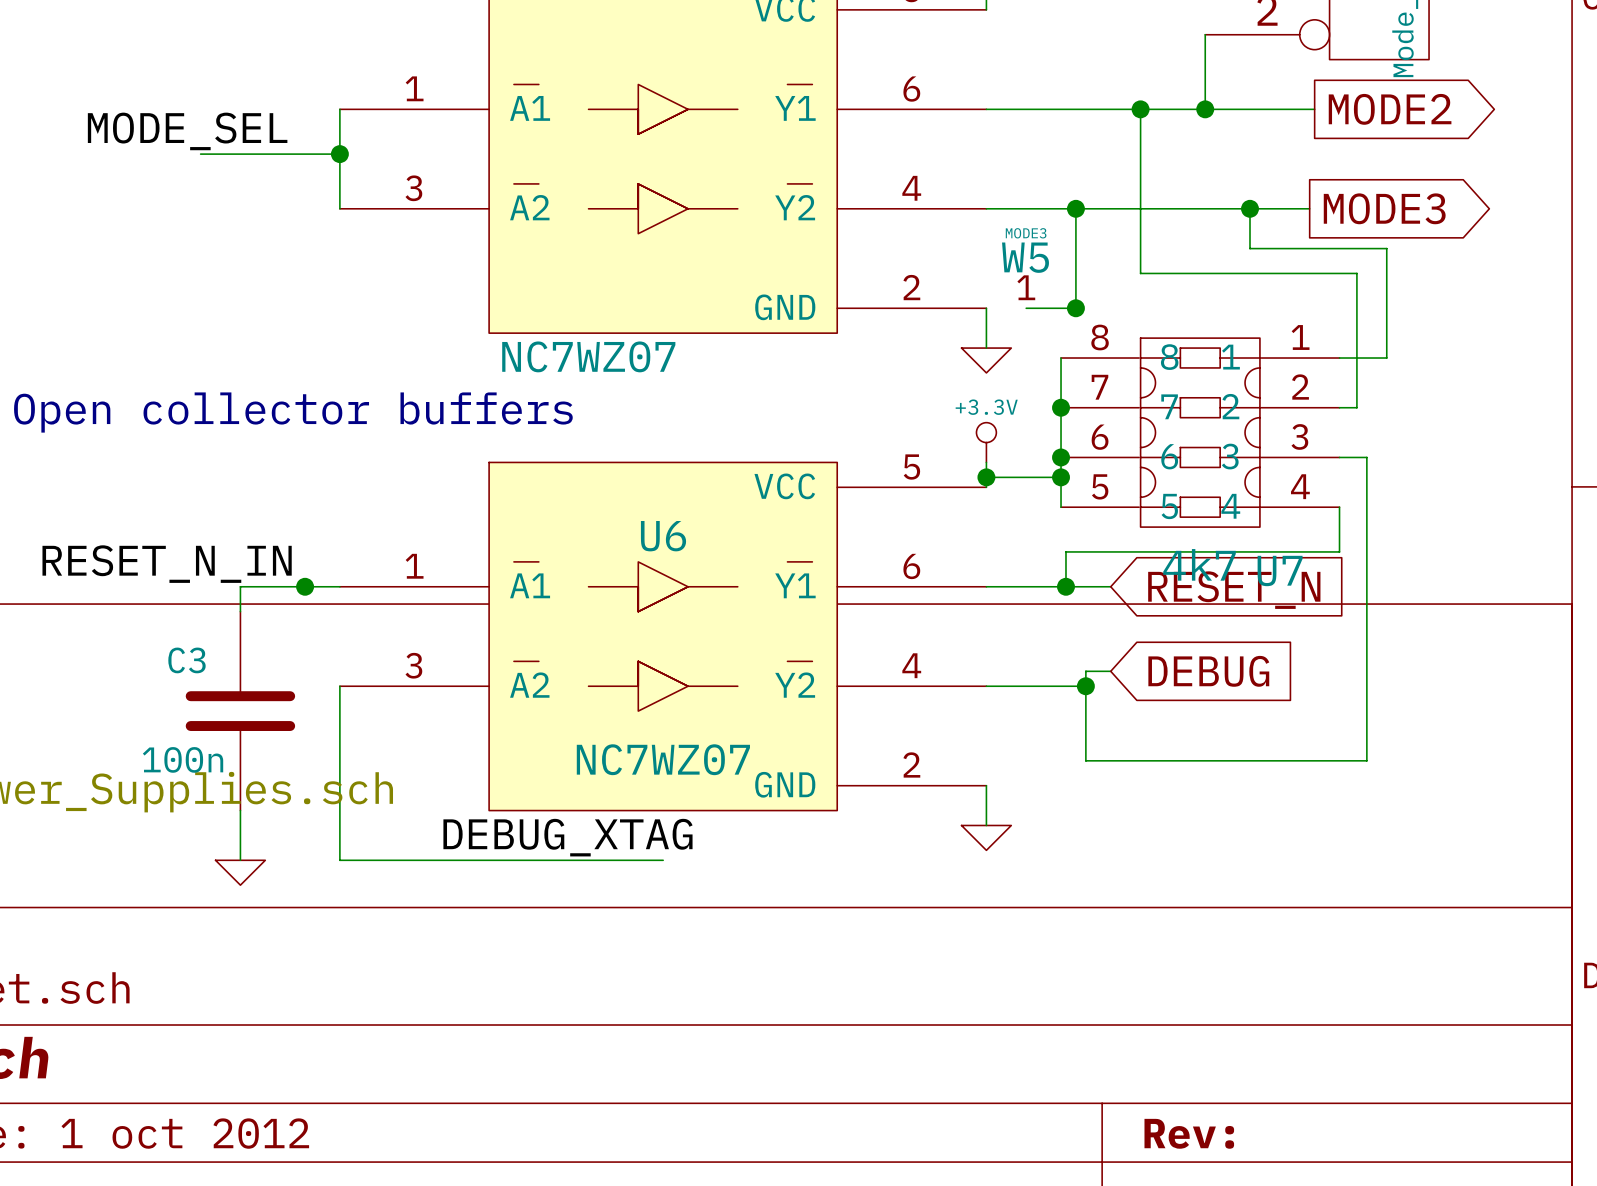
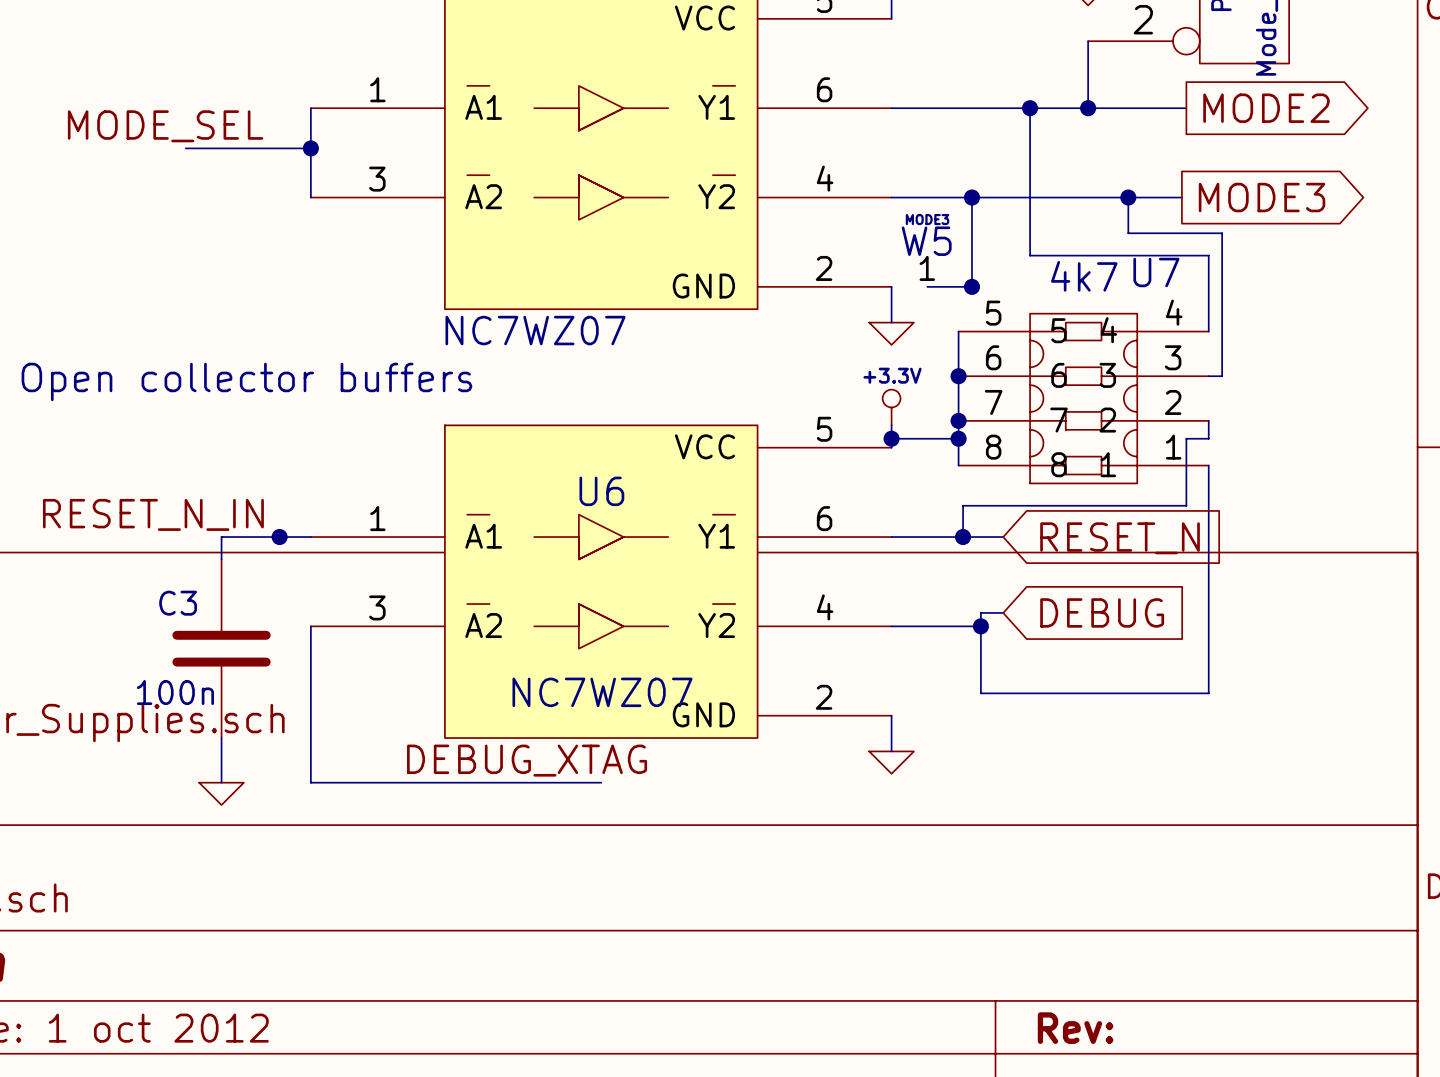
wire: (1354, 248) (1386, 248) (1386, 358) (1339, 358) -> (1208, 255) (1208, 331)
wire: (1339, 273) (1356, 273) (1356, 407) (1354, 407) -> (1222, 233) (1222, 376)
U7 flip: as is (1200, 432) -> up-down (1083, 398)
wire: (1339, 457) (1366, 457) (1366, 760) (1339, 760) -> (1208, 505) (1208, 693)
wire: (1314, 551) (1339, 551) -> (1186, 505) (1186, 438) (1208, 438) (1208, 420)

